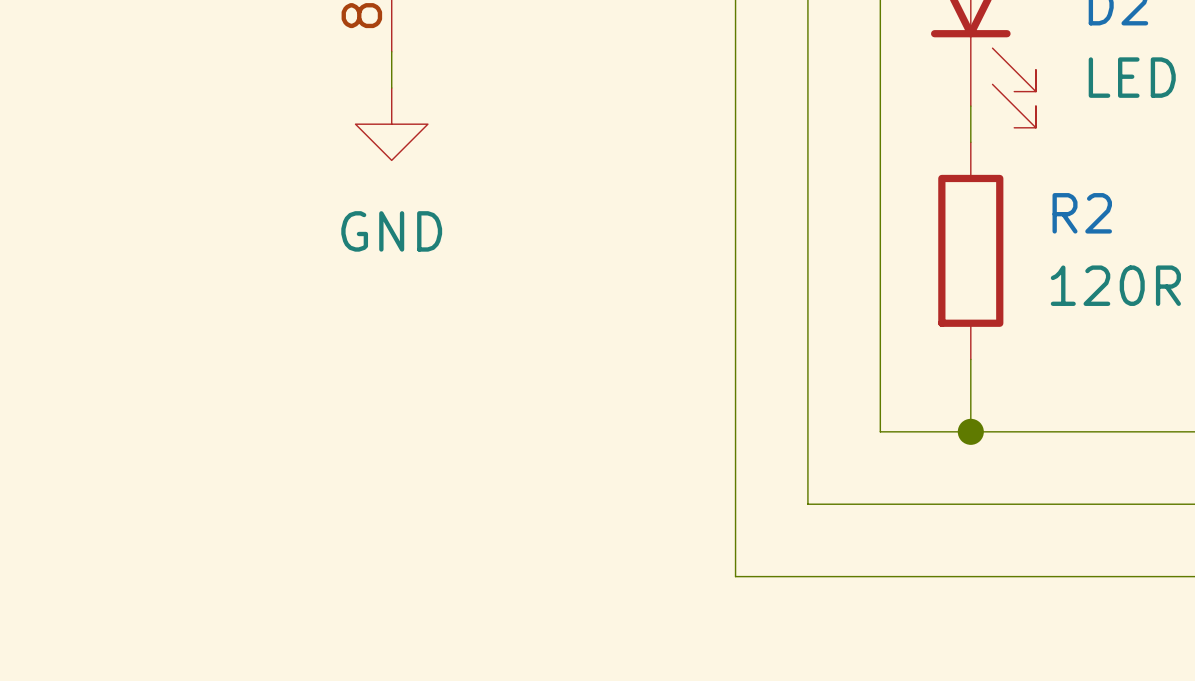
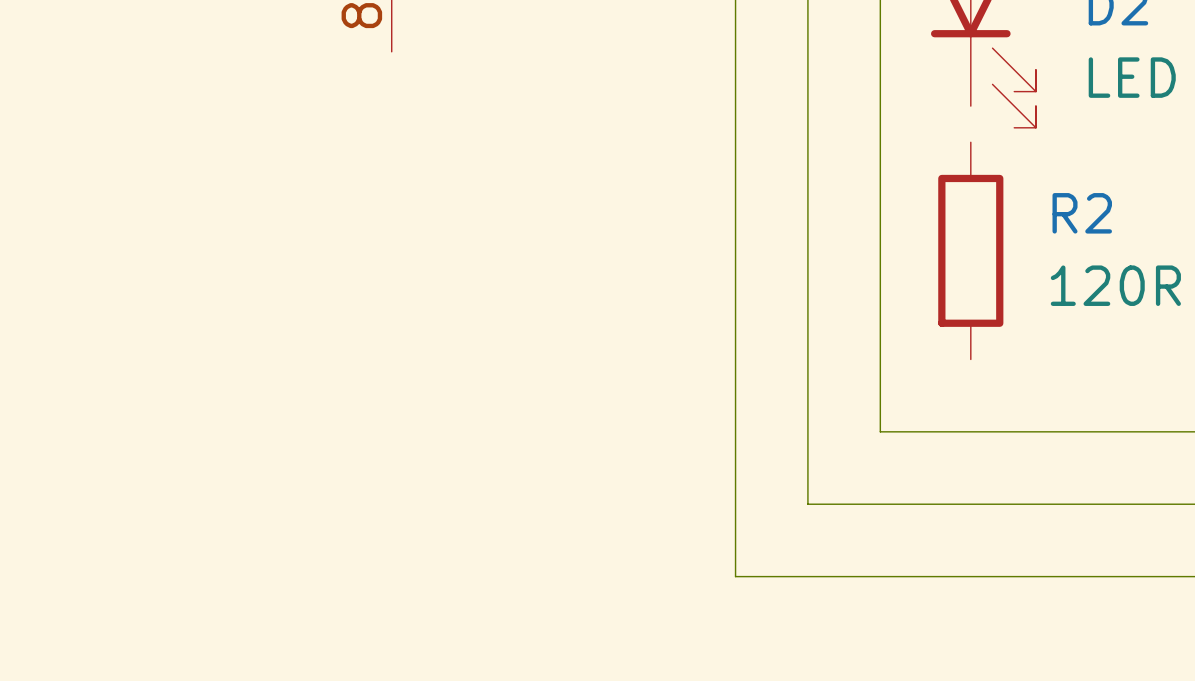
wire: (391, 51) (391, 87) -> none
wire: (970, 106) (970, 142) -> none
power symbol: GND (391, 124) -> none
wire: (970, 359) (970, 431) -> none
junction: (970, 431) -> none

